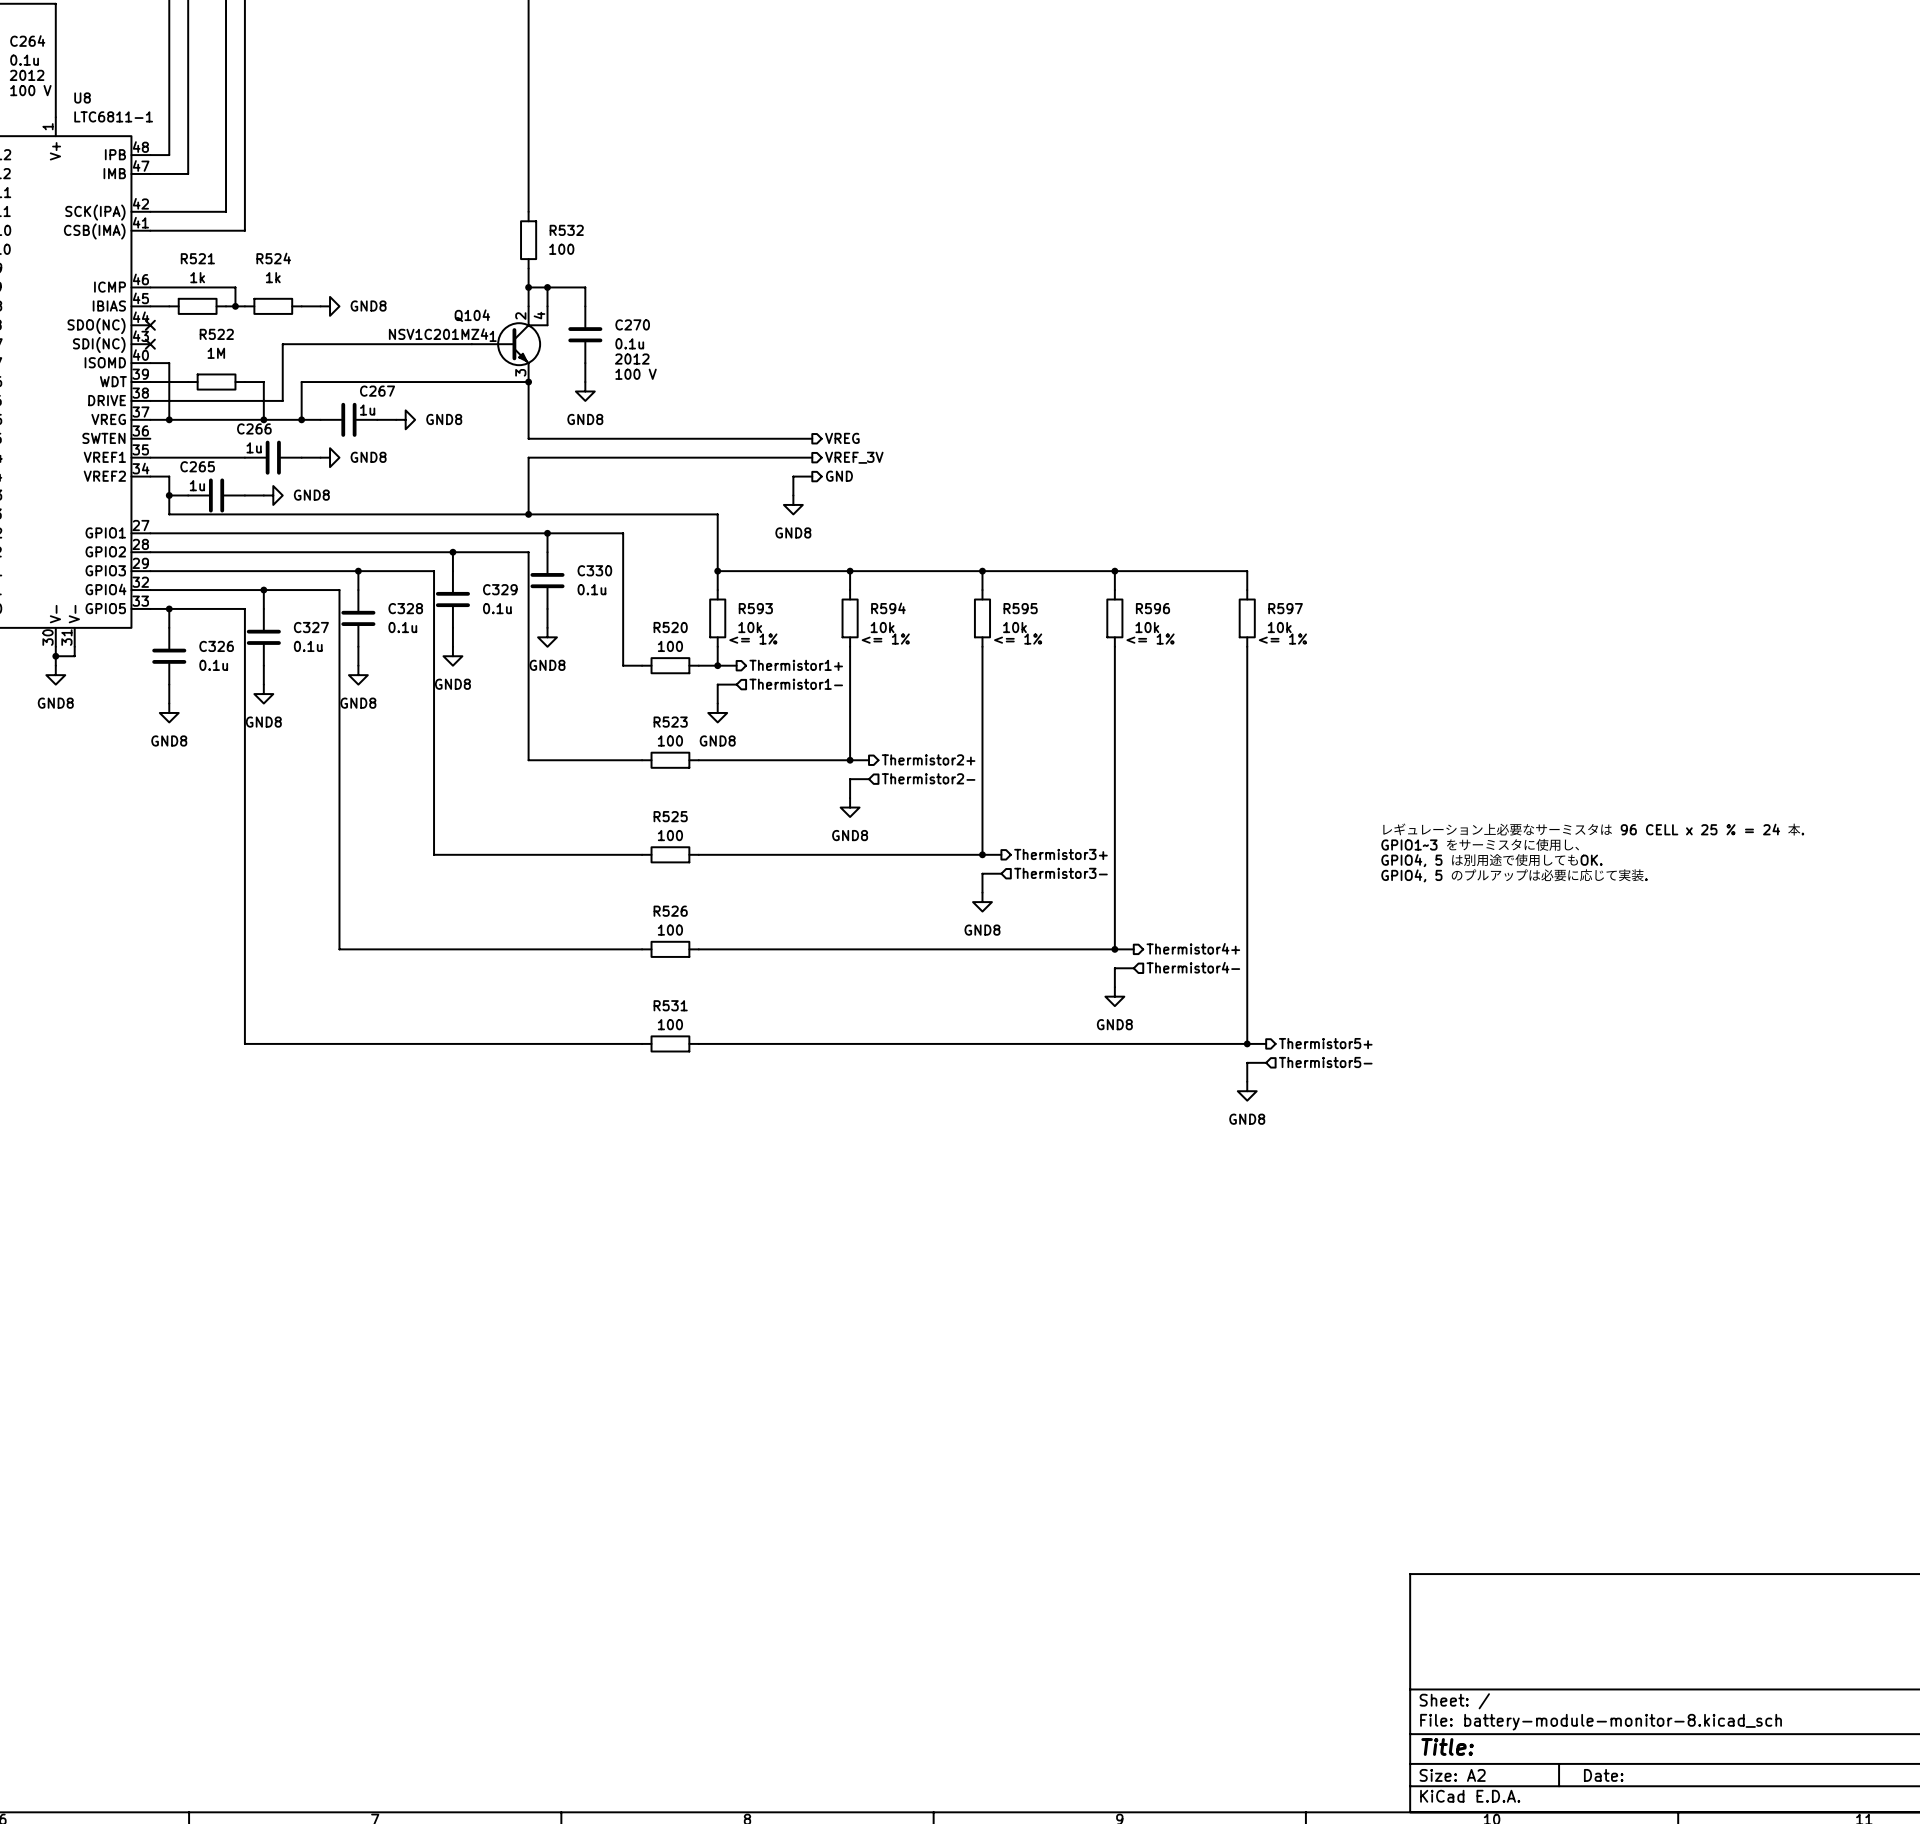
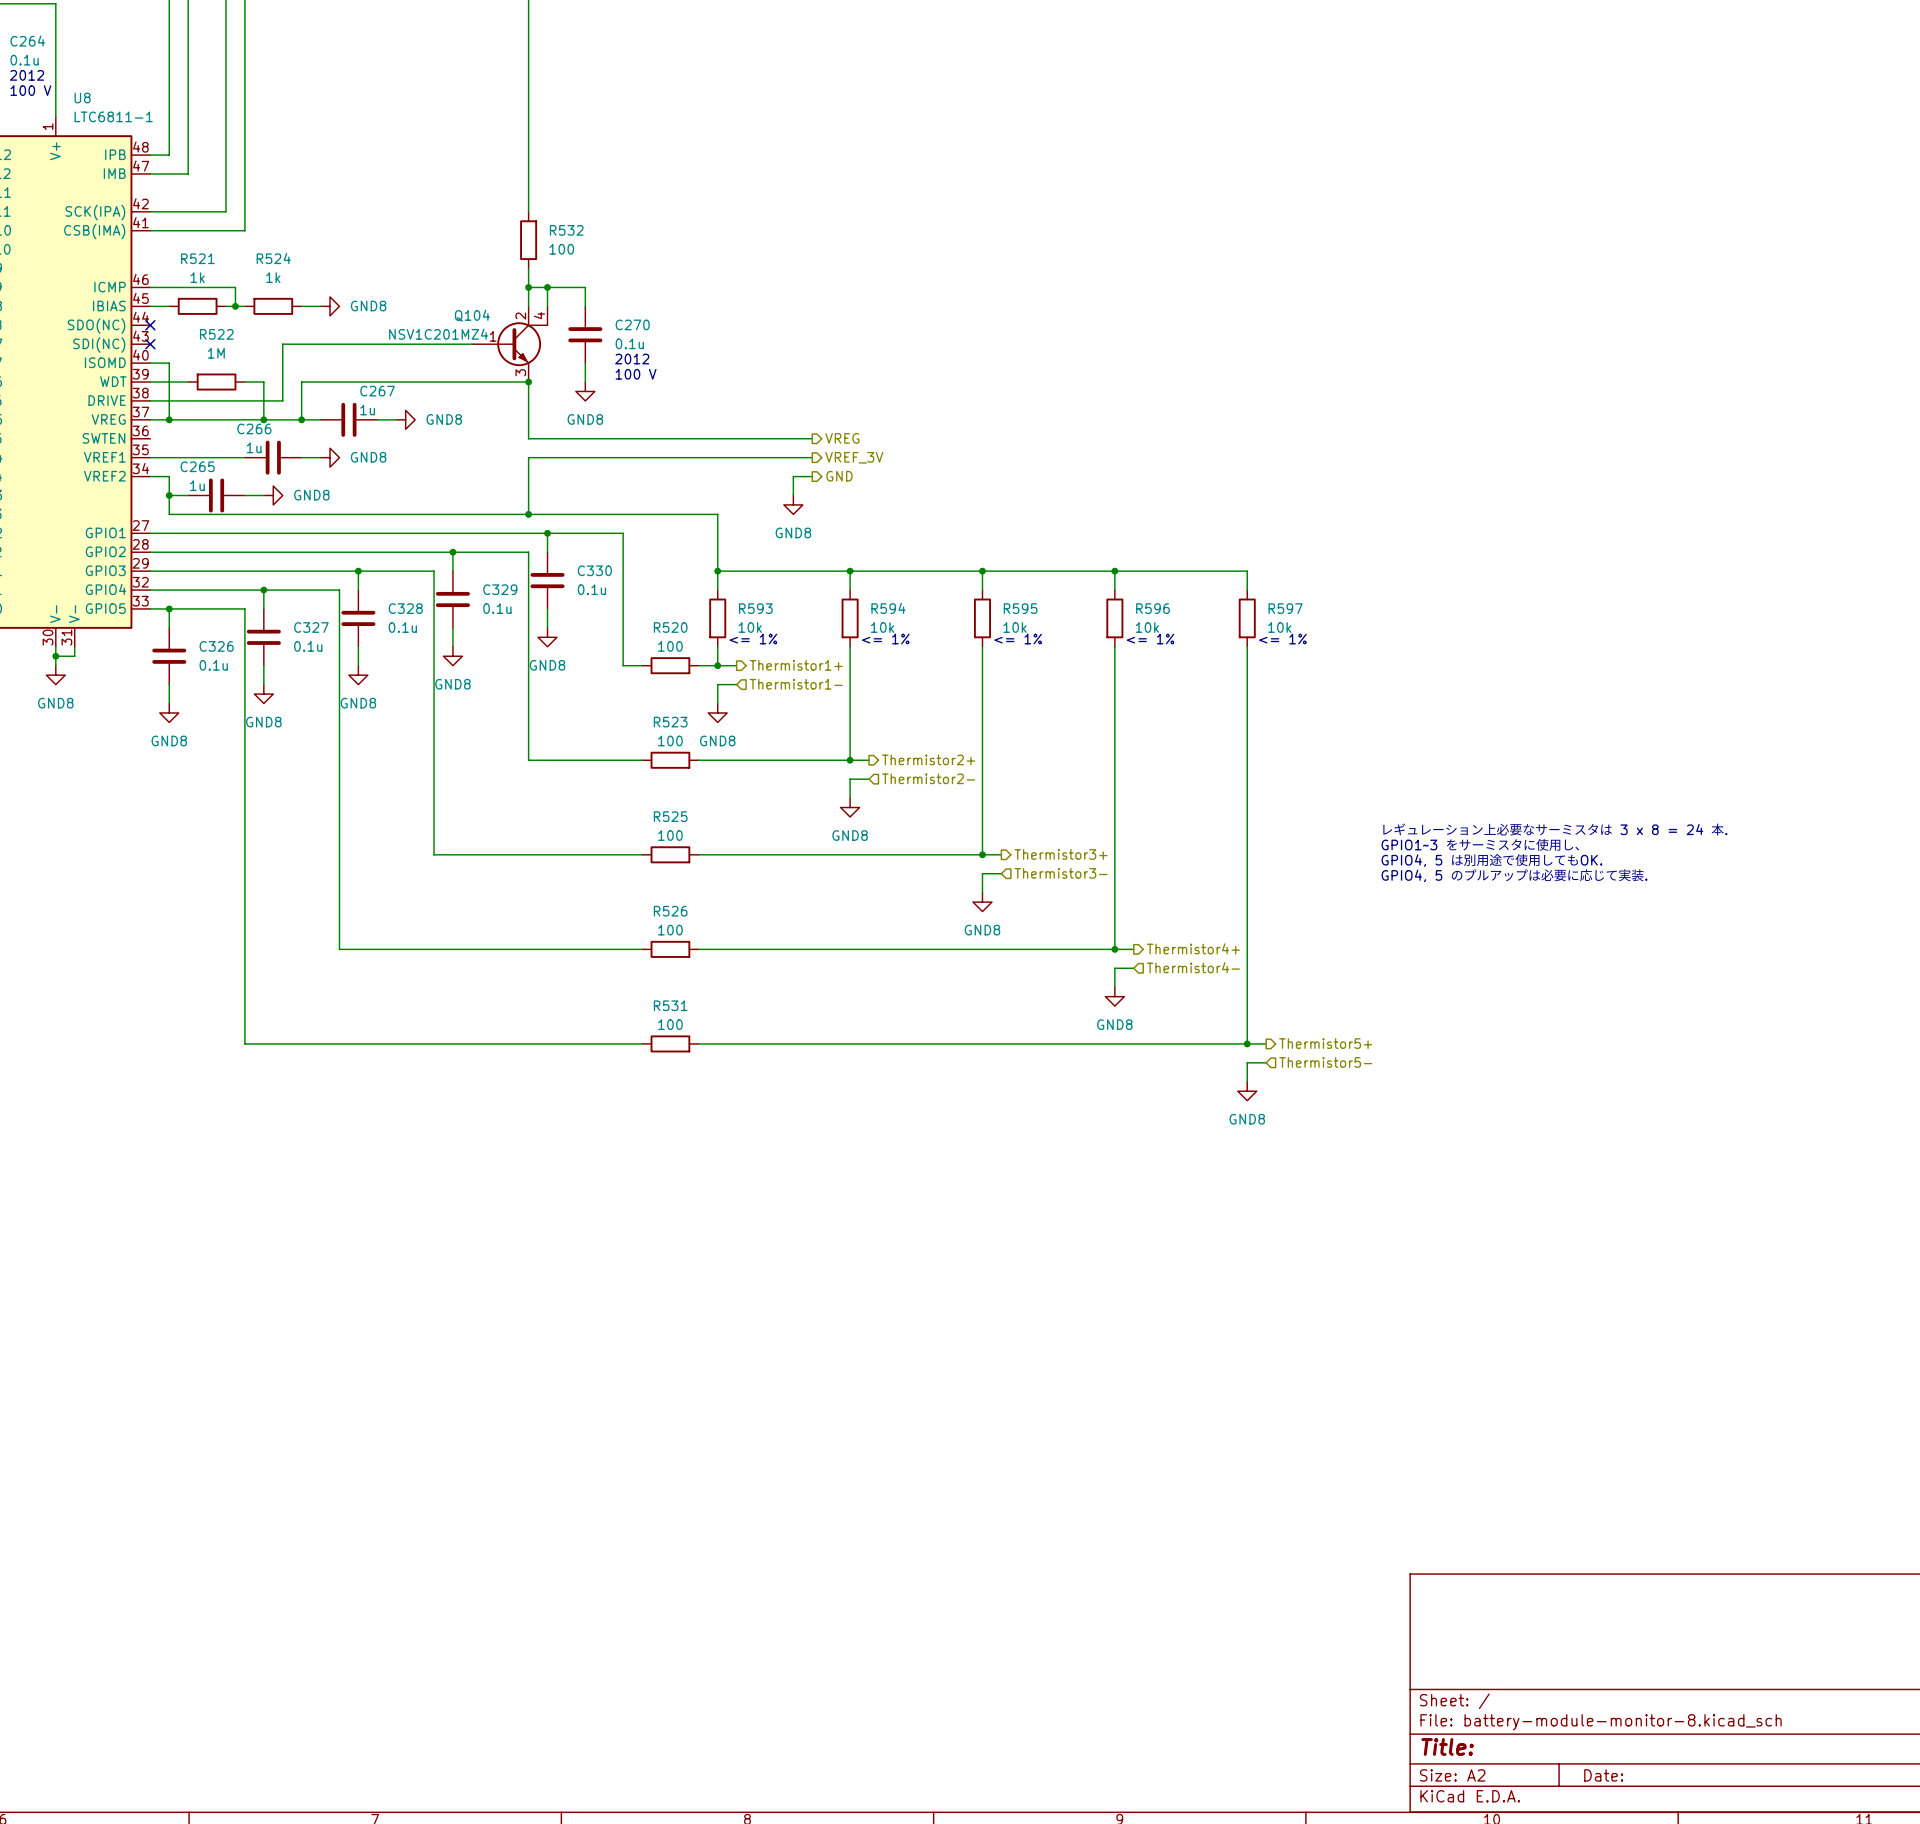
text: レギュレーション上必要なサーミスタは 96 CELL x 25 % = 24 本. (1593, 829) -> レギュレーション上必要なサーミスタは 3 x 8 = 24 本. (1555, 829)

